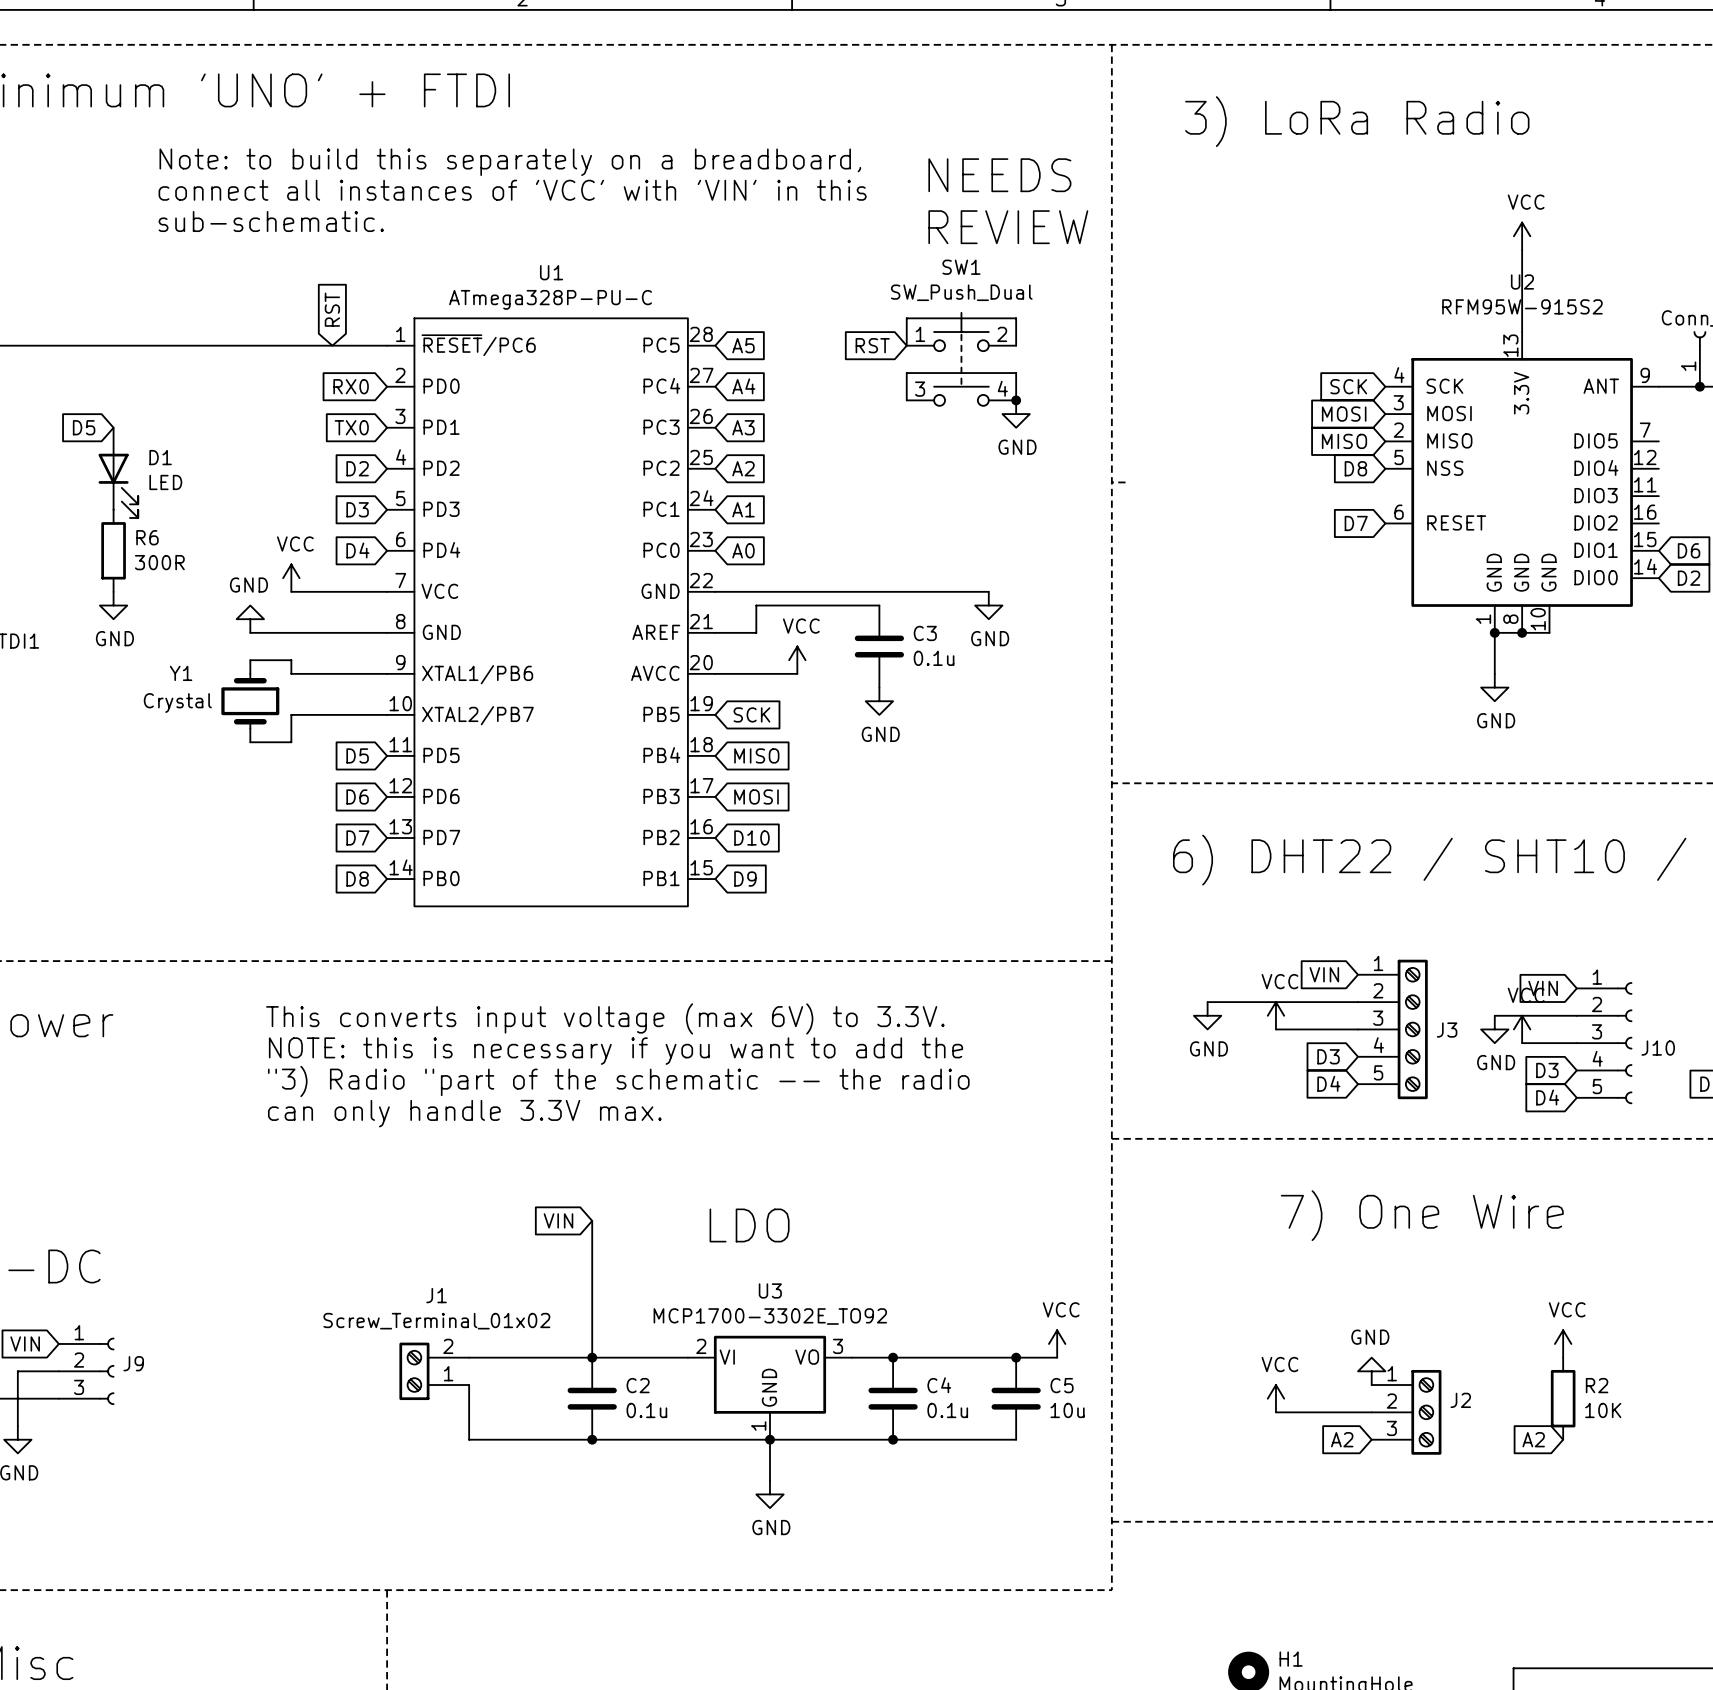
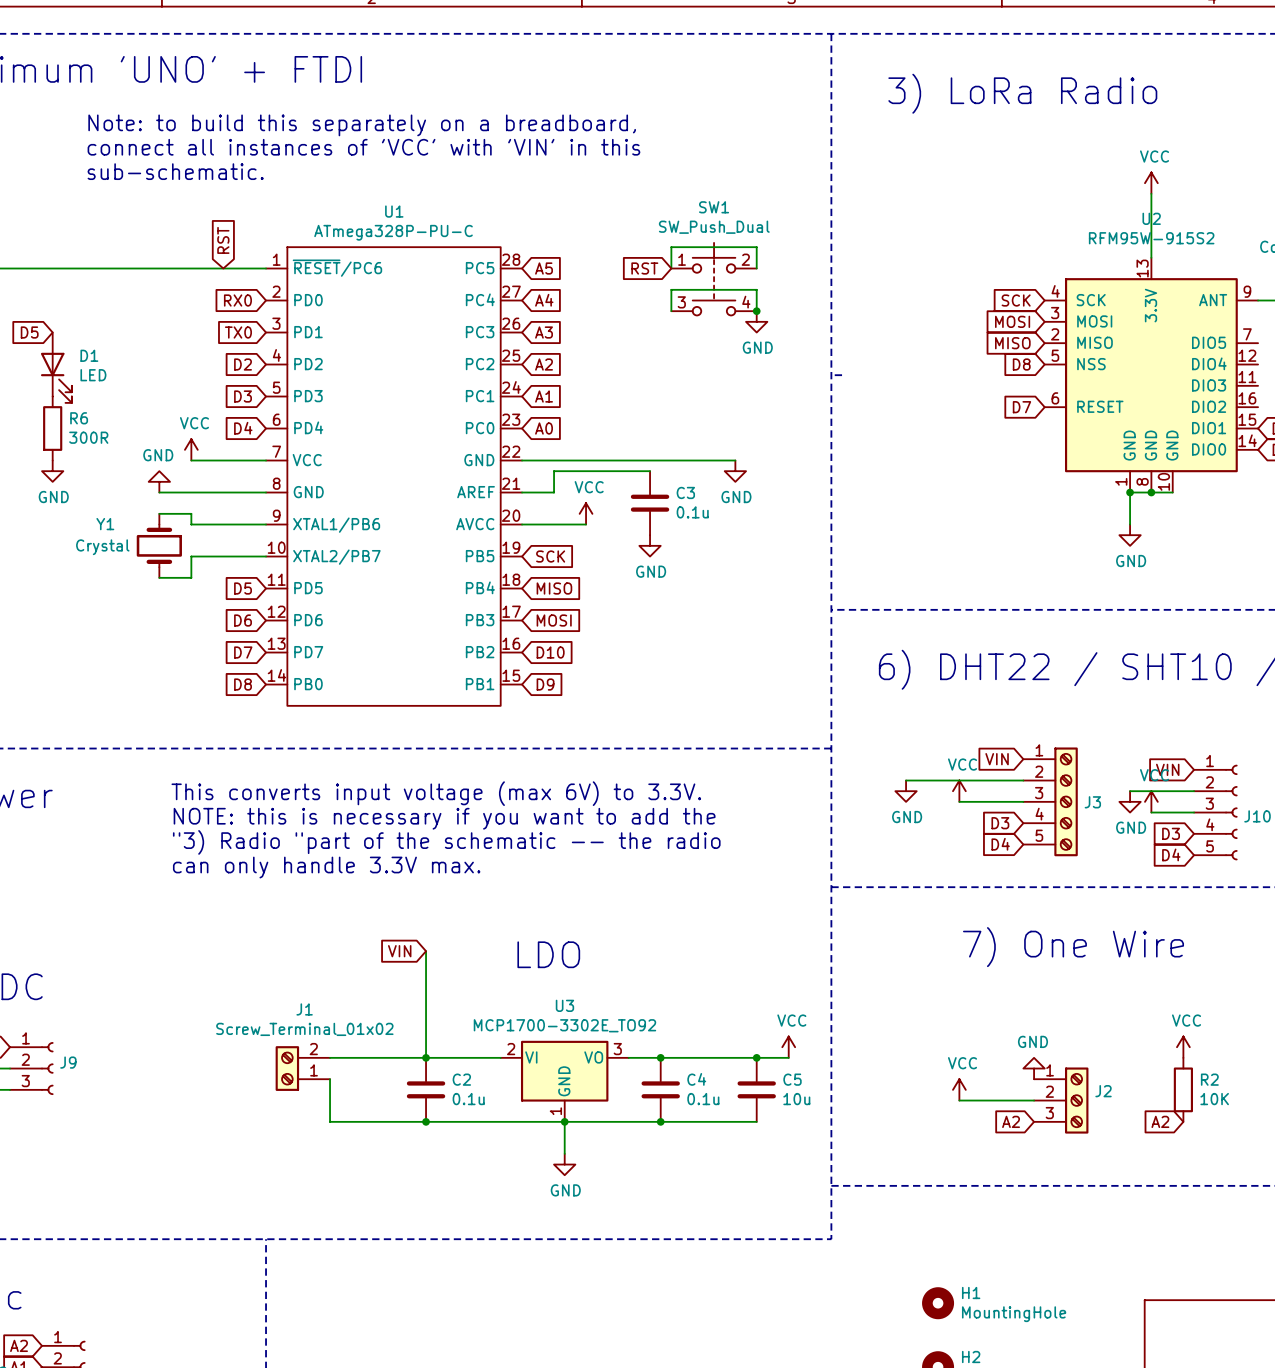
text: NEEDS (999, 175) -> none
text: REVIEW (1008, 227) -> none

